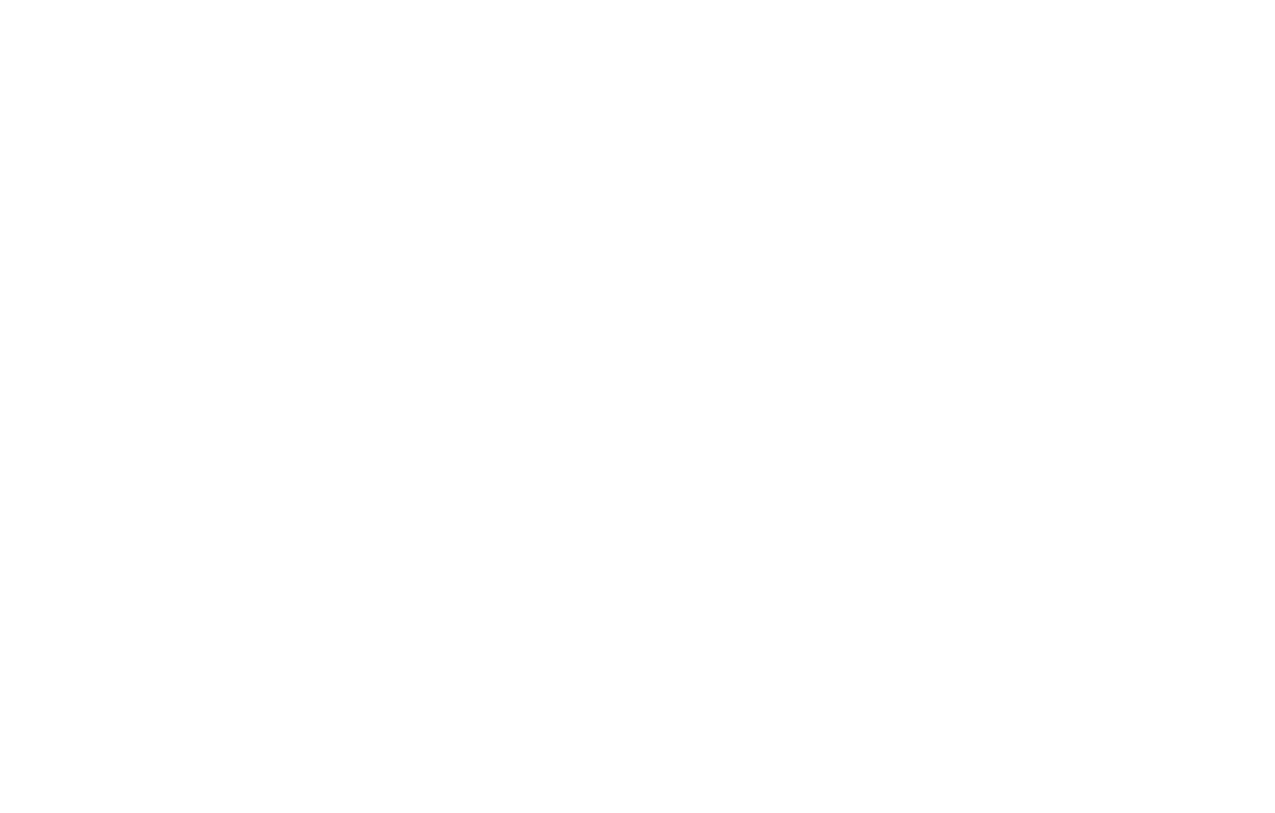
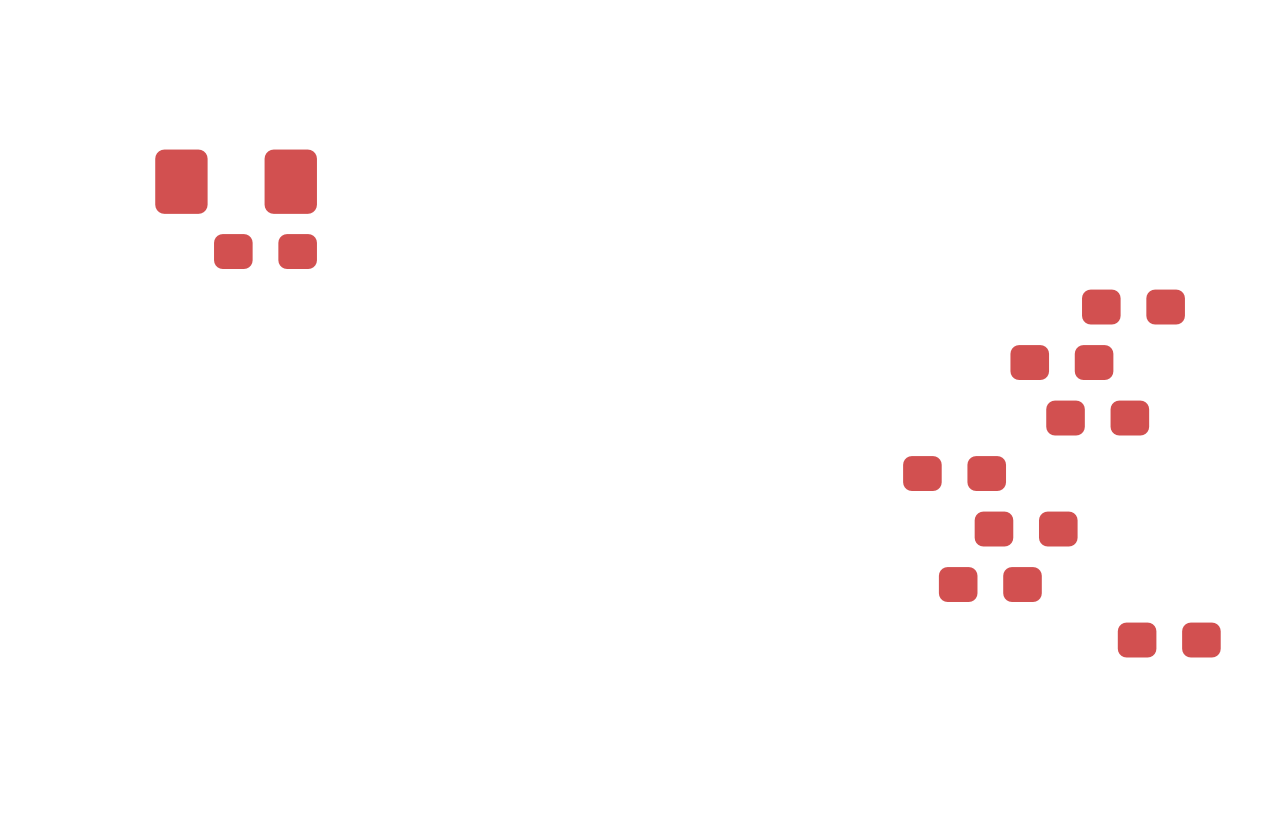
part: none -> (236, 181)
part: none -> (265, 251)
part: none -> (1133, 307)
part: none -> (1061, 362)
part: none -> (1097, 418)
part: none -> (954, 473)
part: none -> (1026, 529)
part: none -> (990, 584)
part: none -> (1169, 640)

